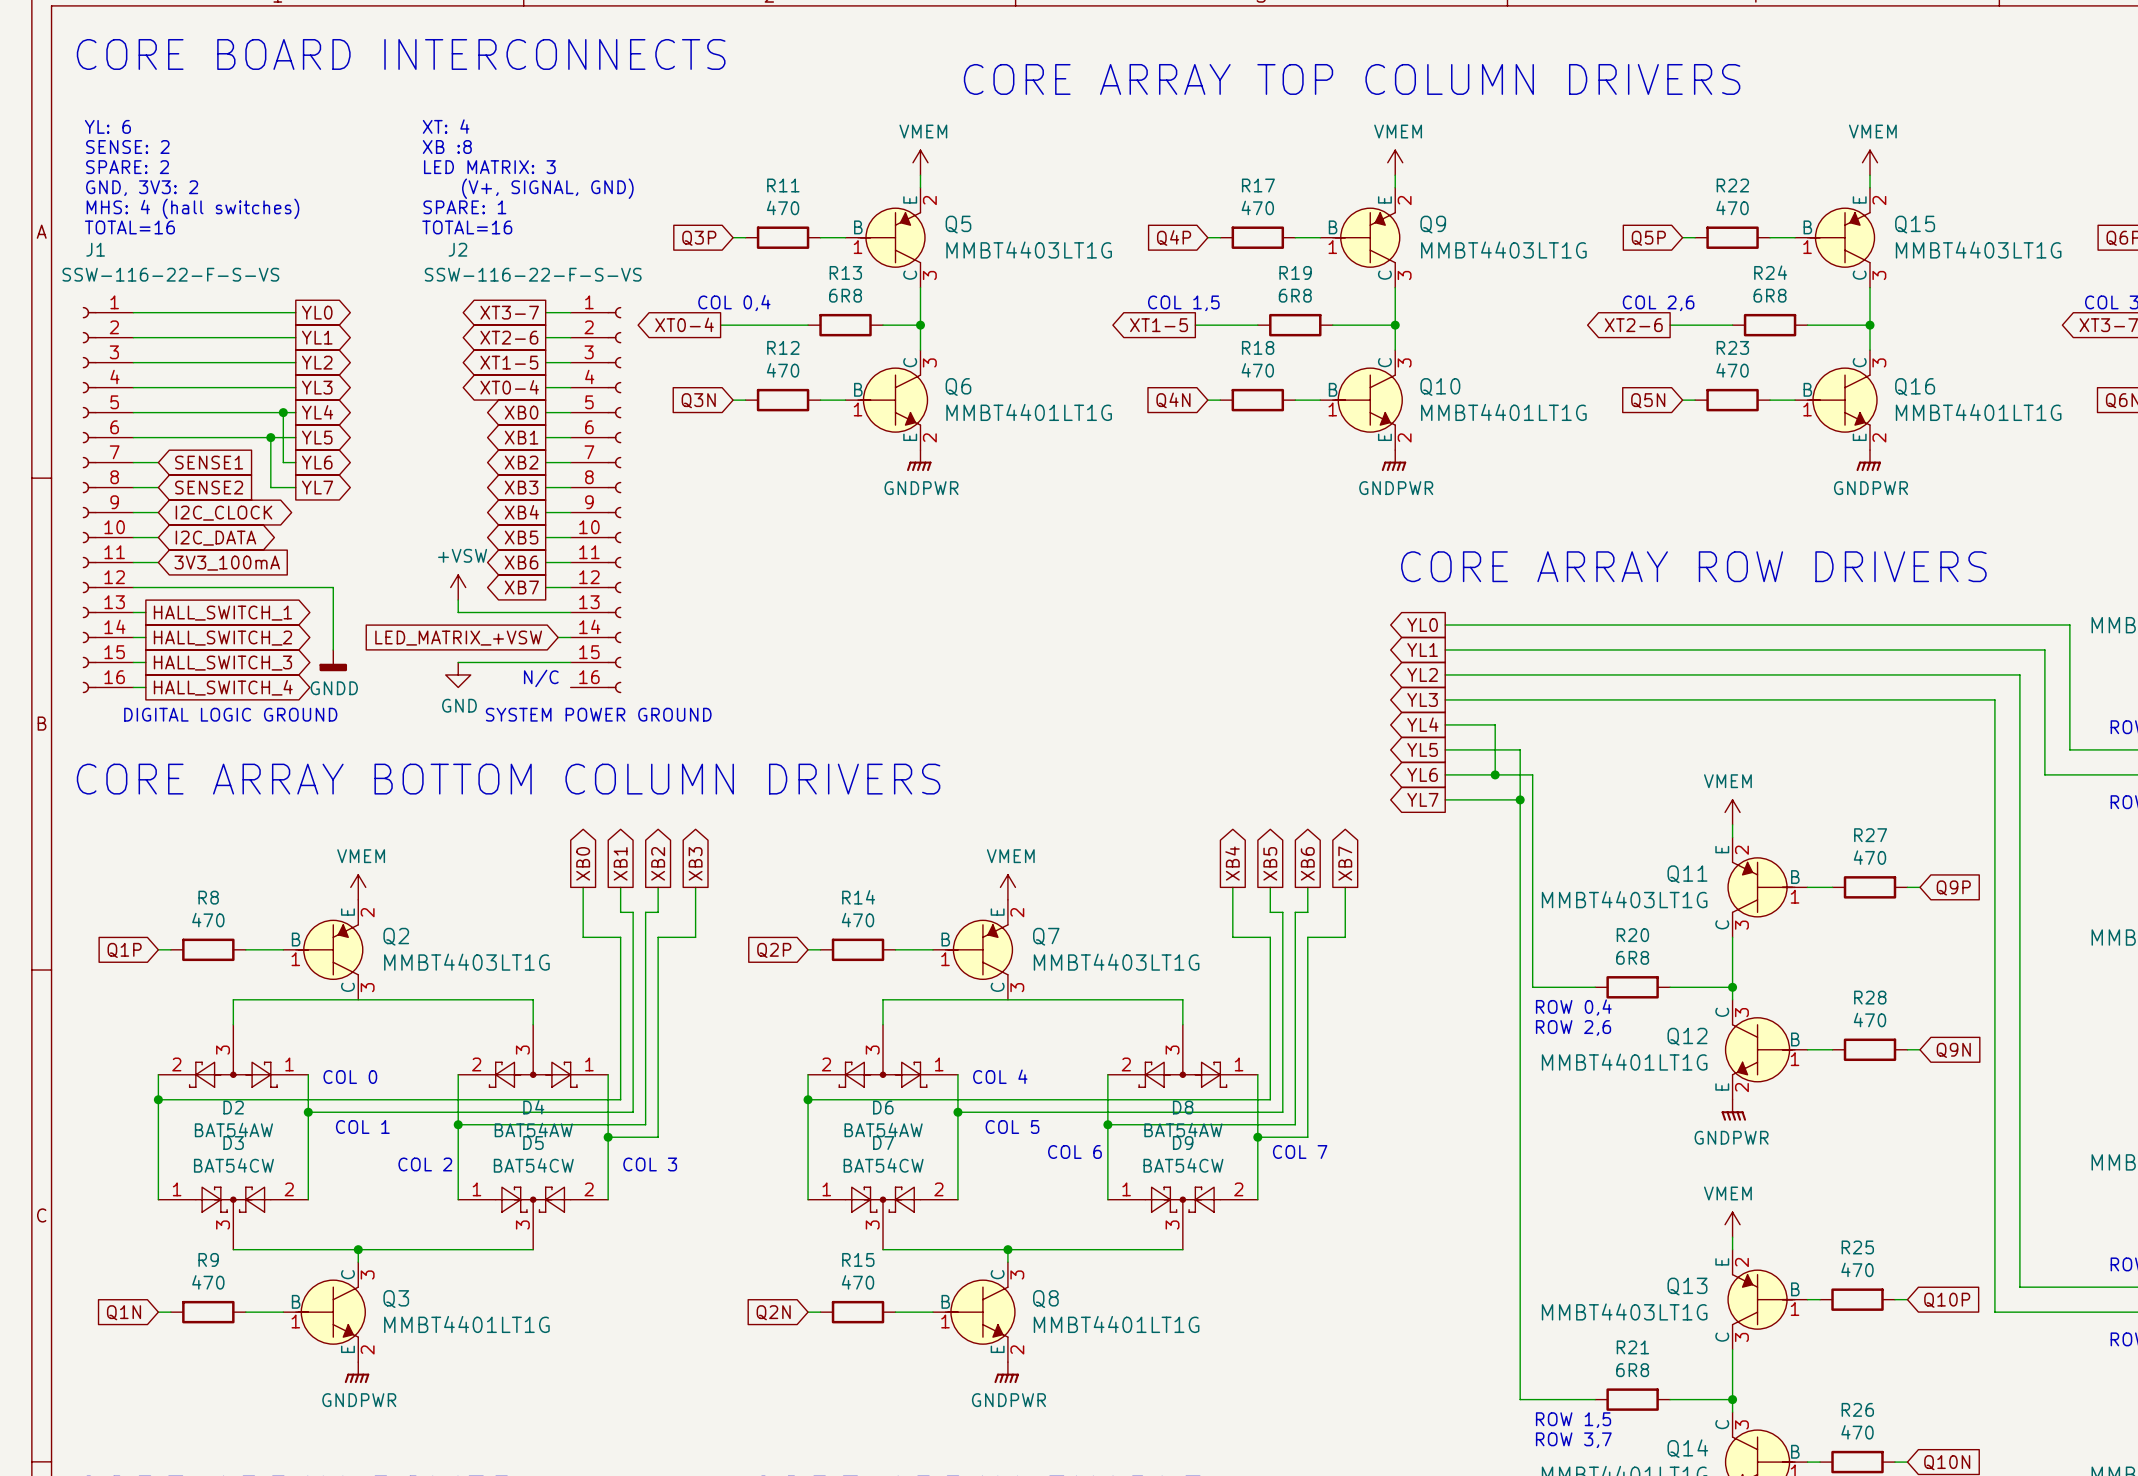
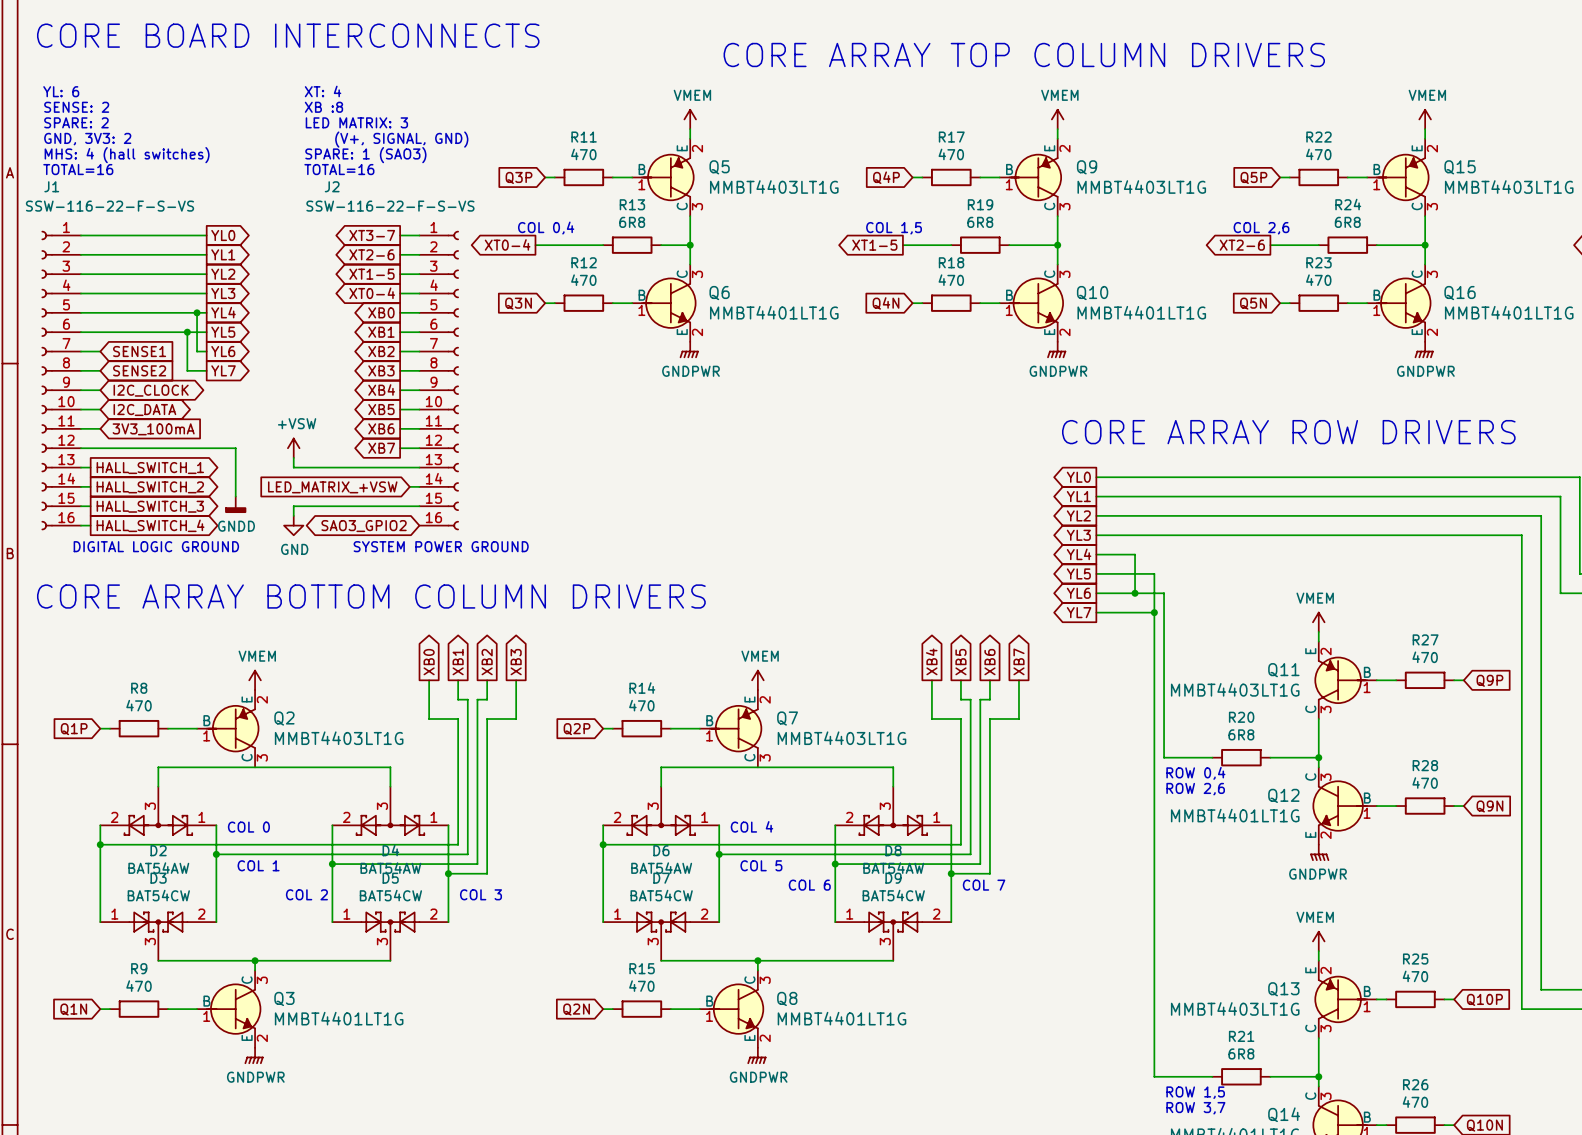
text: SPARE: 1 (464, 207) -> SPARE: 1 (SAO3) (365, 155)
power symbol position: +VSW (458, 587) -> +VSW (293, 448)
wire: (458, 600) (458, 612) -> (293, 457) (293, 467) (332, 467)
wire: none -> (332, 506) (293, 506) (293, 515)
power symbol position: GND (458, 674) -> GND (293, 525)
text: N/C (541, 678) -> none
global label: none -> SAO3_GPIO2 (364, 526)

